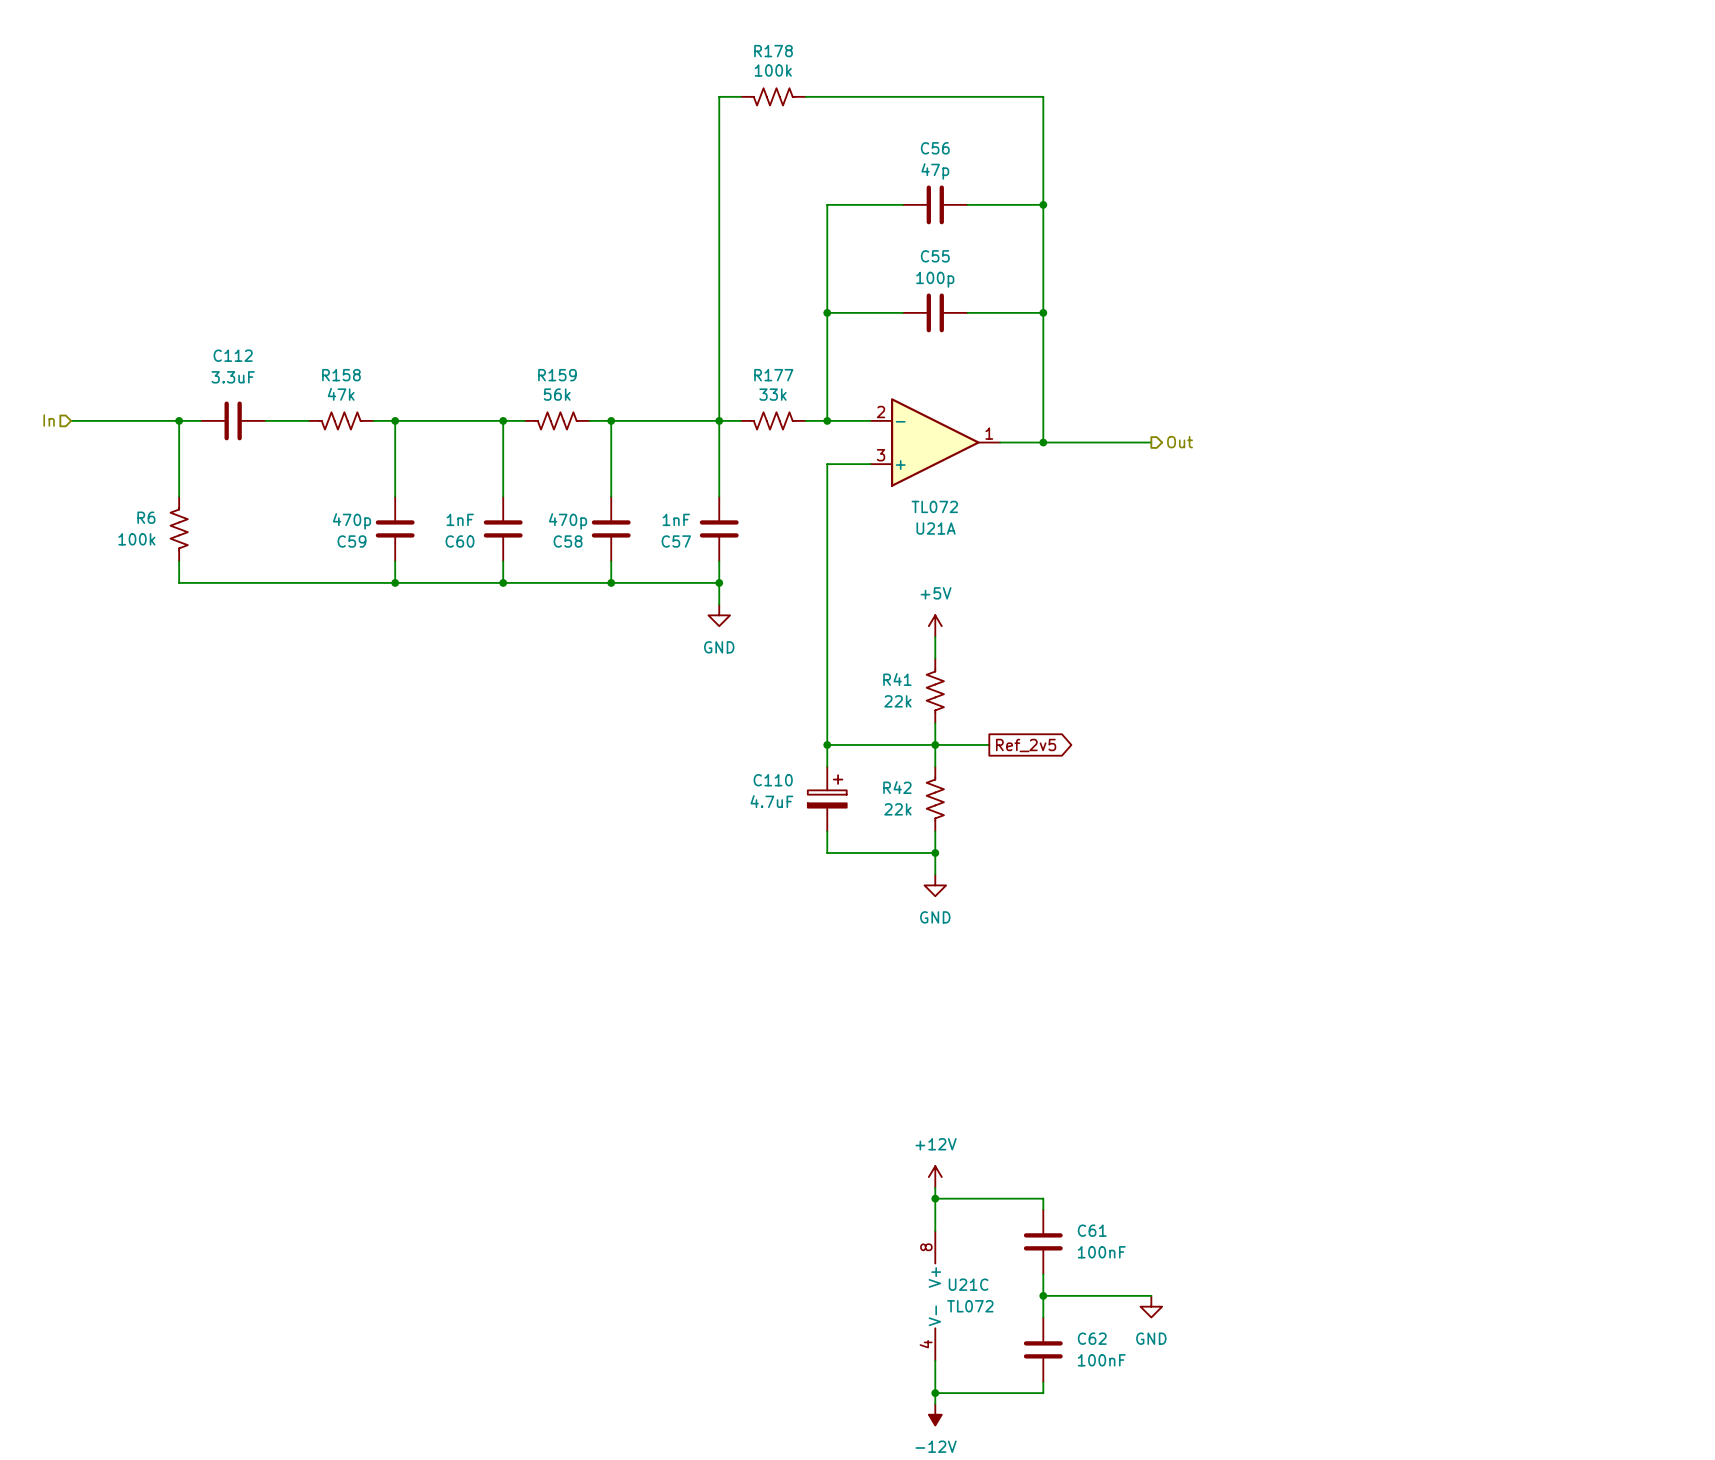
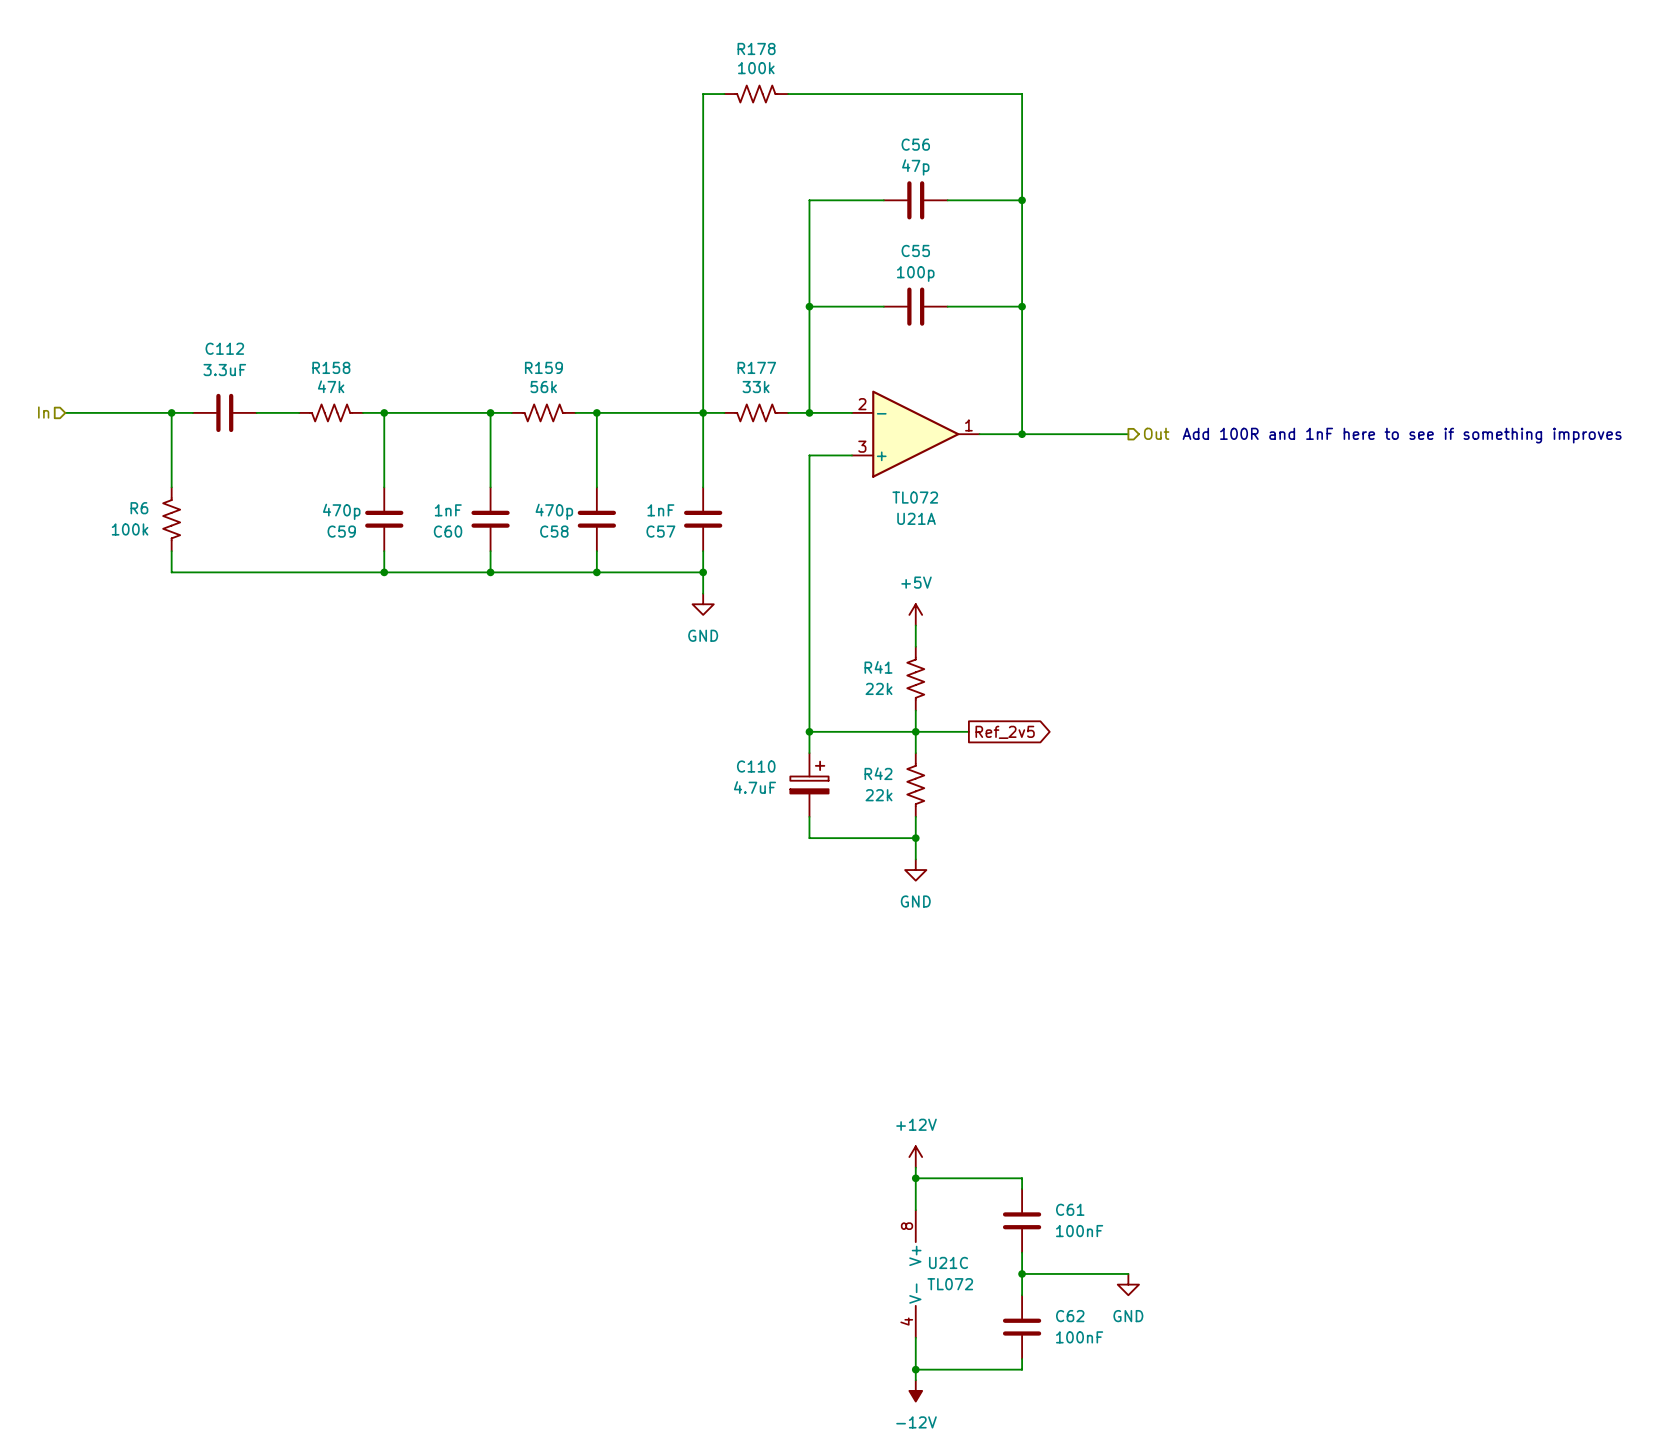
text: none -> Add 100R and 1nF here to see if something improves (1402, 435)

